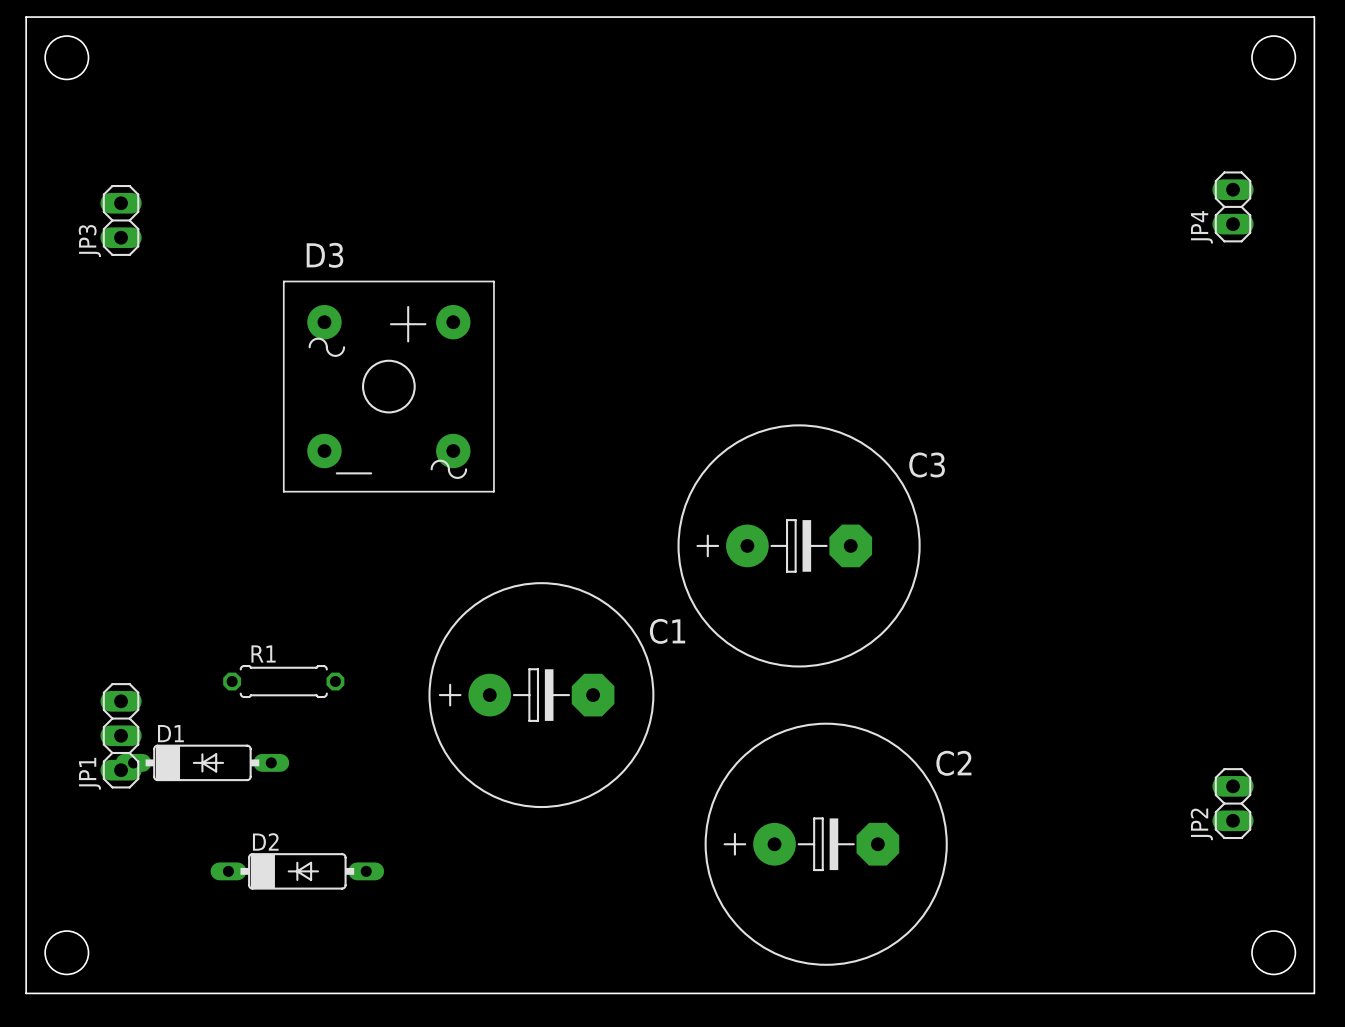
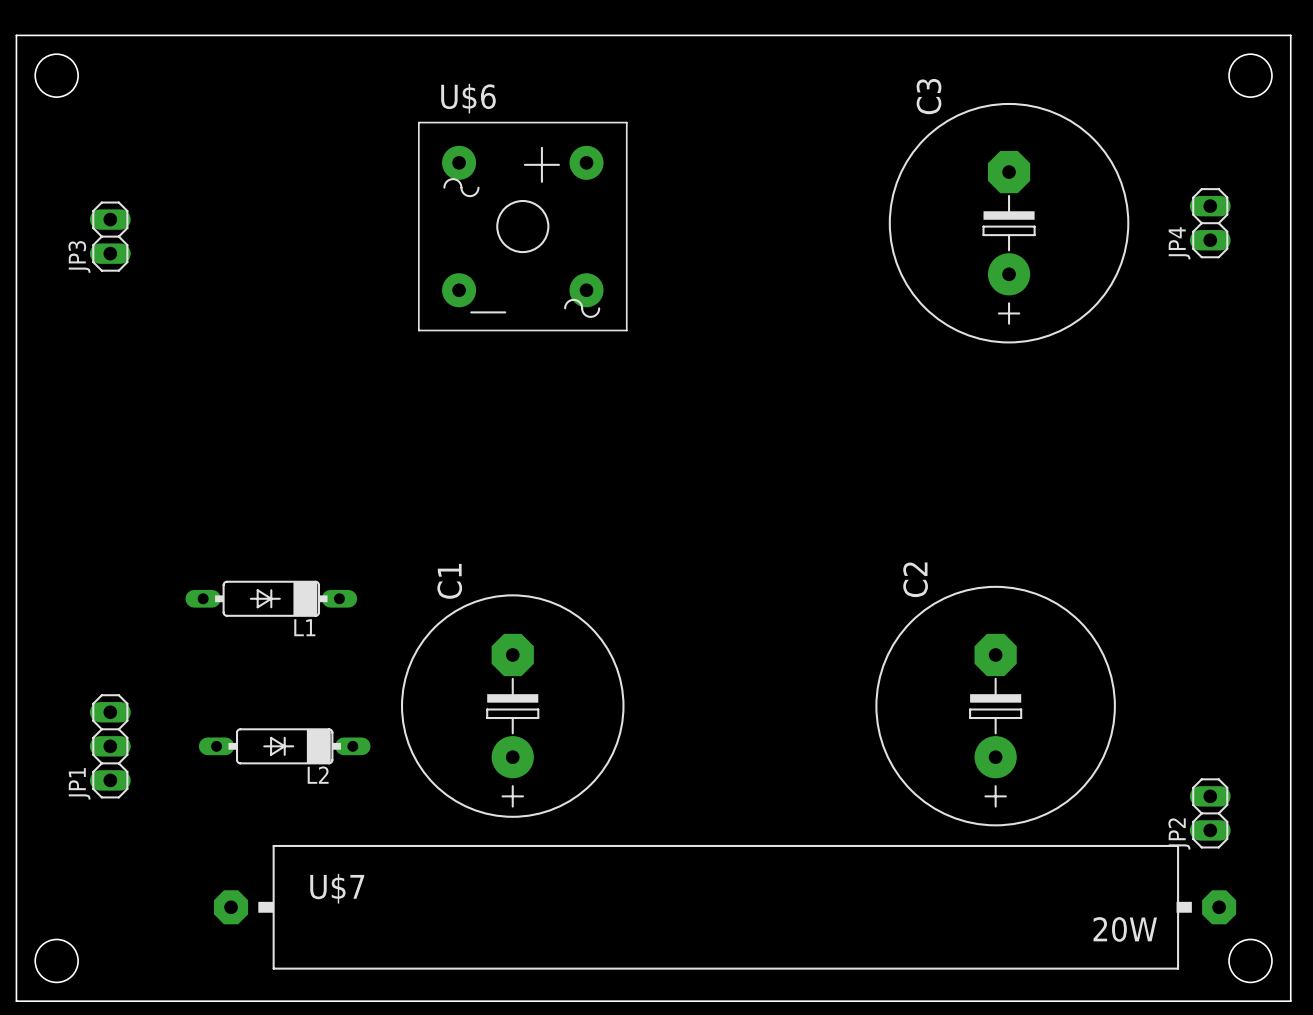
U$6: none -> (522, 226)
D3: (388, 386) -> none
C3 rotation: 0° (799, 545) -> 90° counterclockwise (1009, 223)
C3 position: (799, 545) -> (1009, 223)
L1: none -> (271, 598)
R1: (283, 681) -> none
C1 rotation: 0° (541, 695) -> 90° counterclockwise (512, 706)
L2: none -> (284, 746)
D1: (202, 762) -> none
C2 rotation: 0° (826, 844) -> 90° counterclockwise (995, 706)
C2 position: (826, 844) -> (995, 706)
D2: (297, 871) -> none
U$7: none -> (725, 907)

